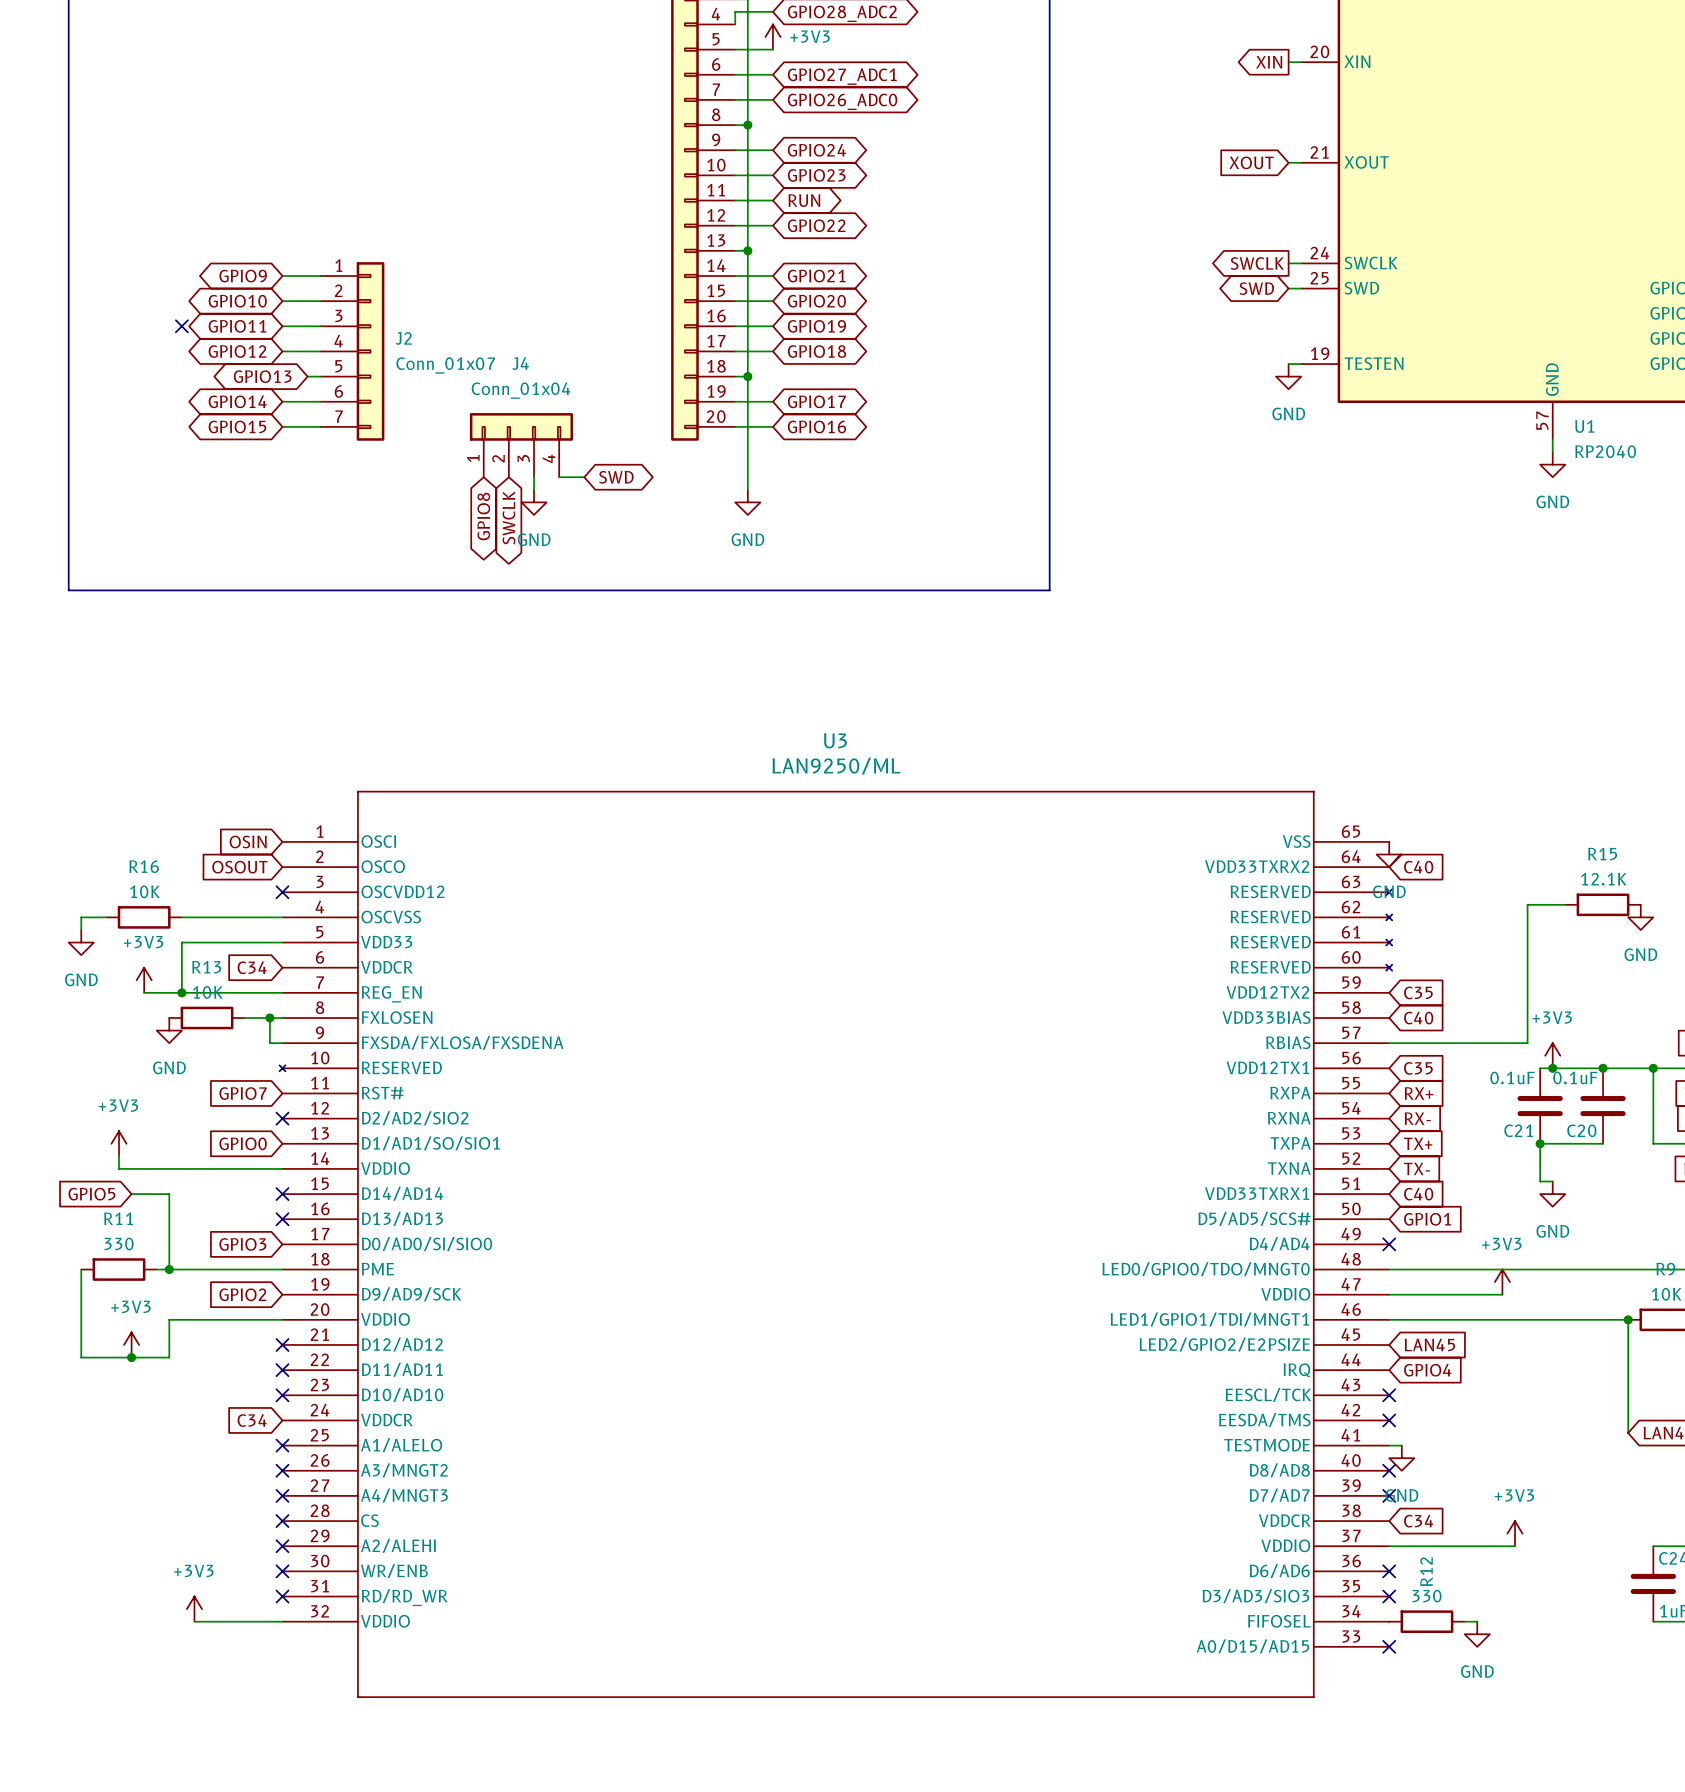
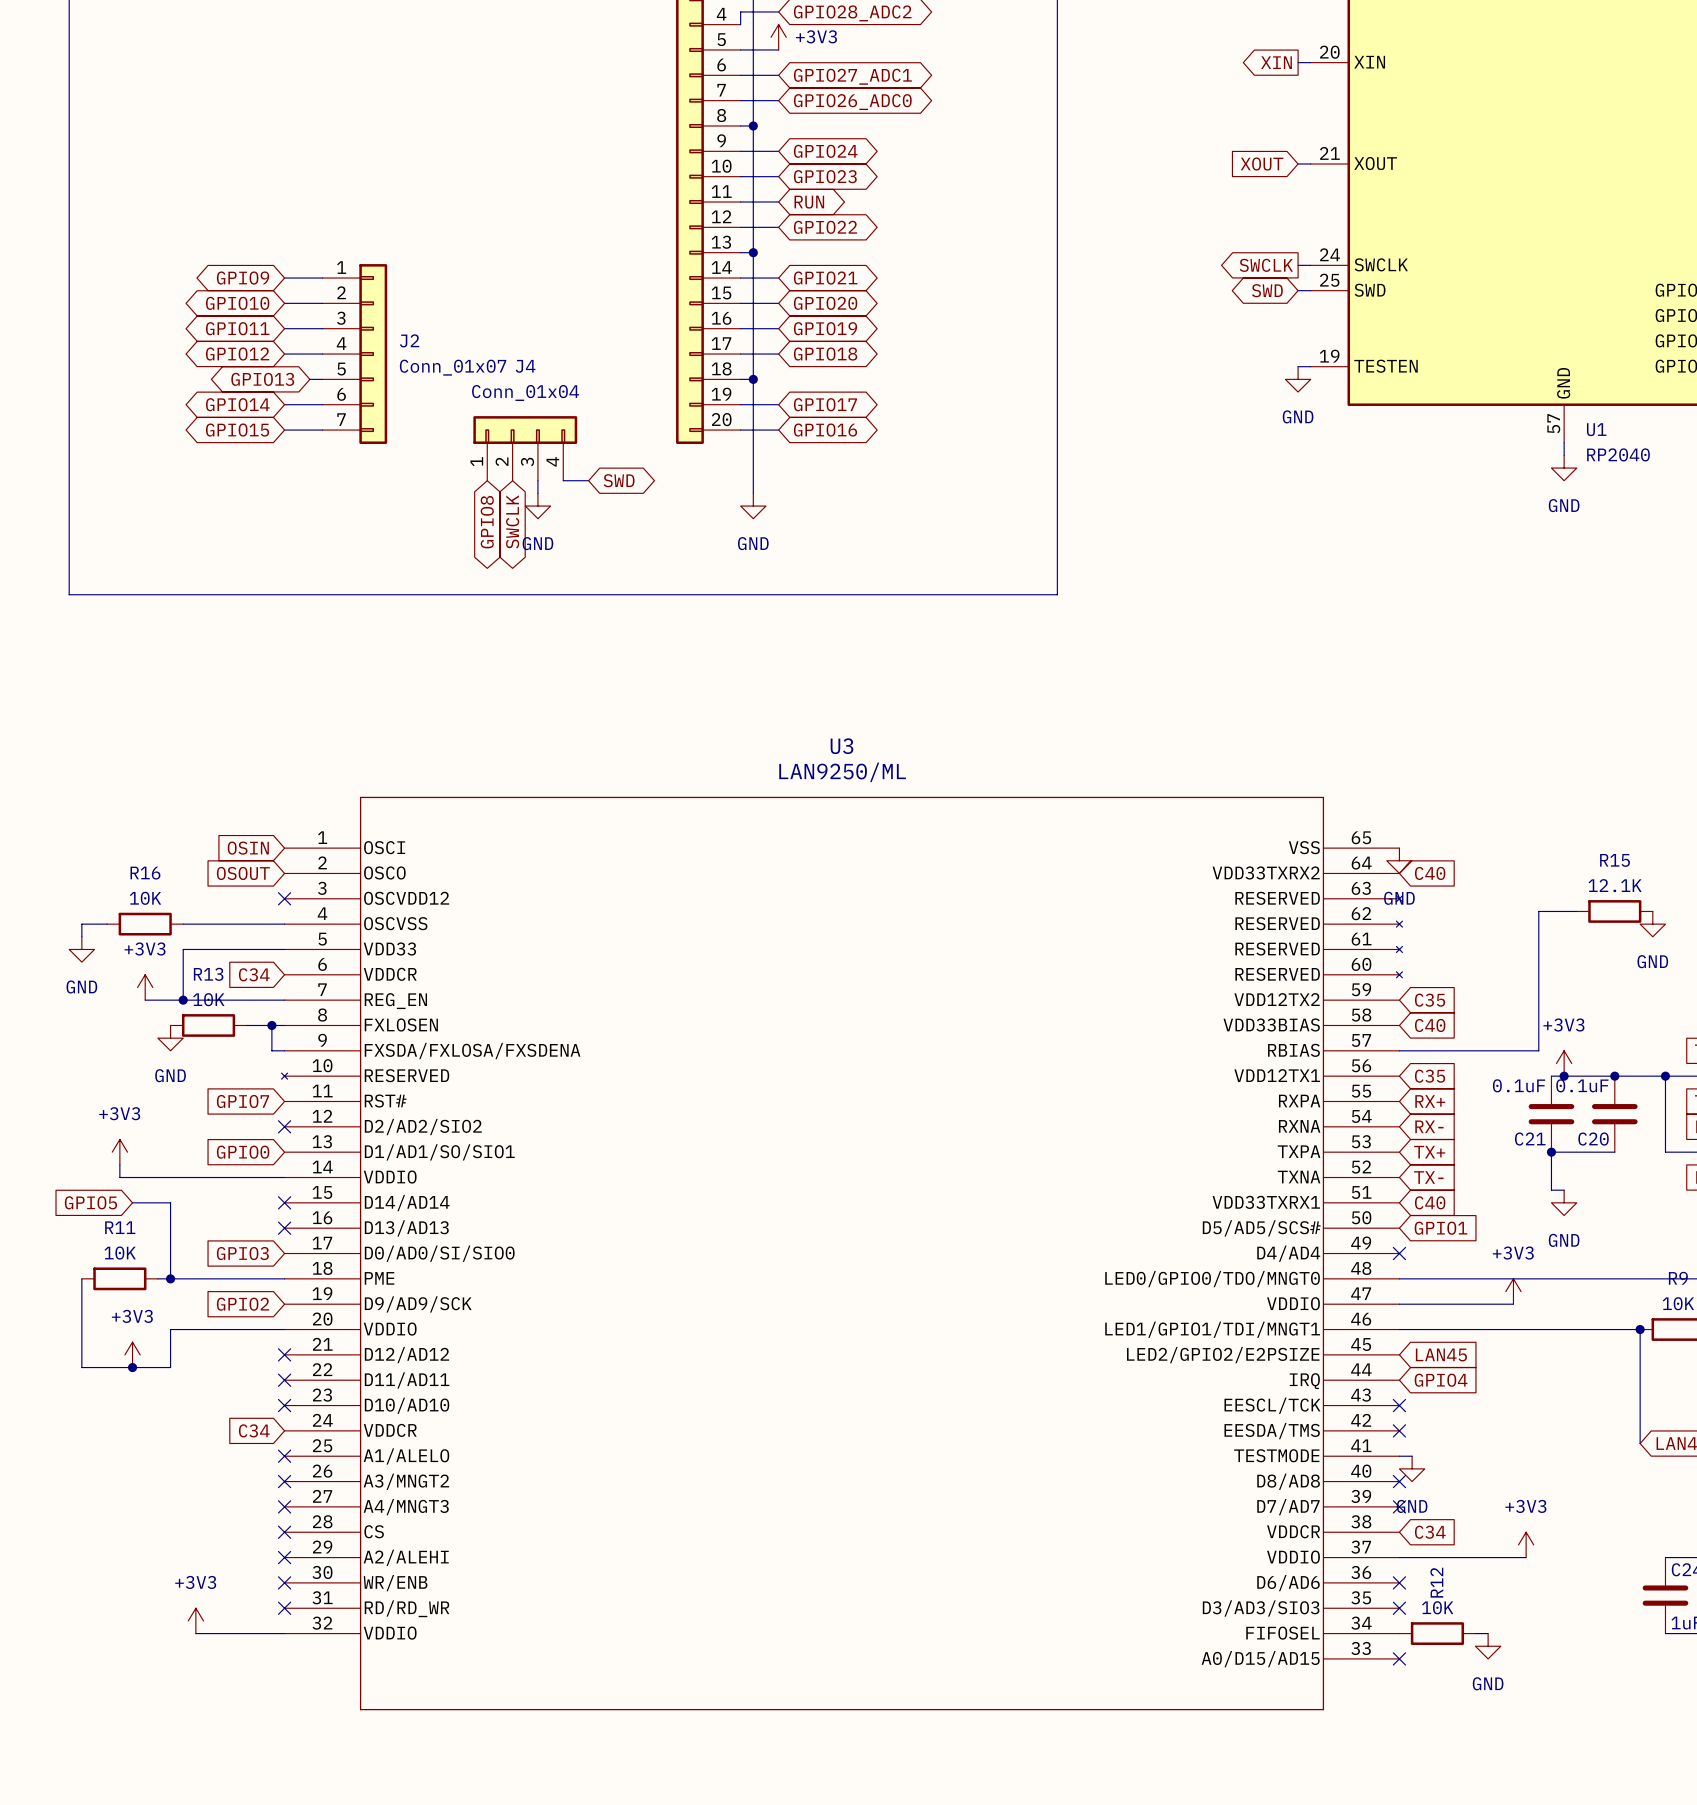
no-connect mark: (181, 326) -> none
R11 value: 330 (119, 1243) -> 10K (120, 1253)
R12 value: 330 (1427, 1596) -> 10K (1437, 1607)

